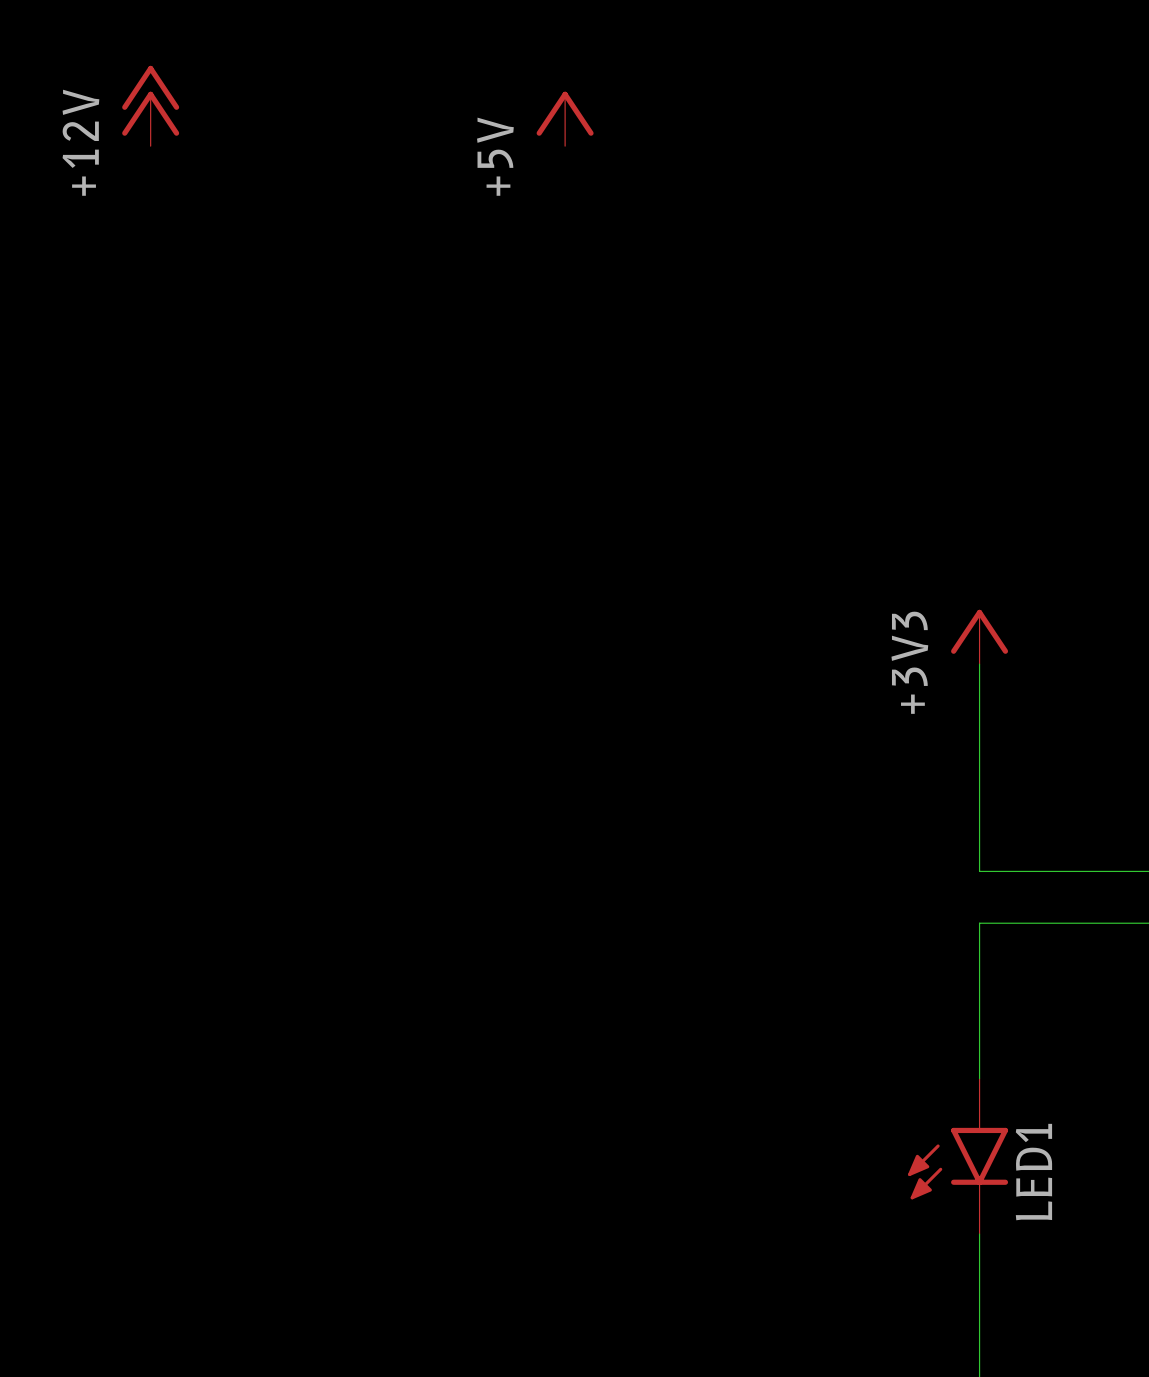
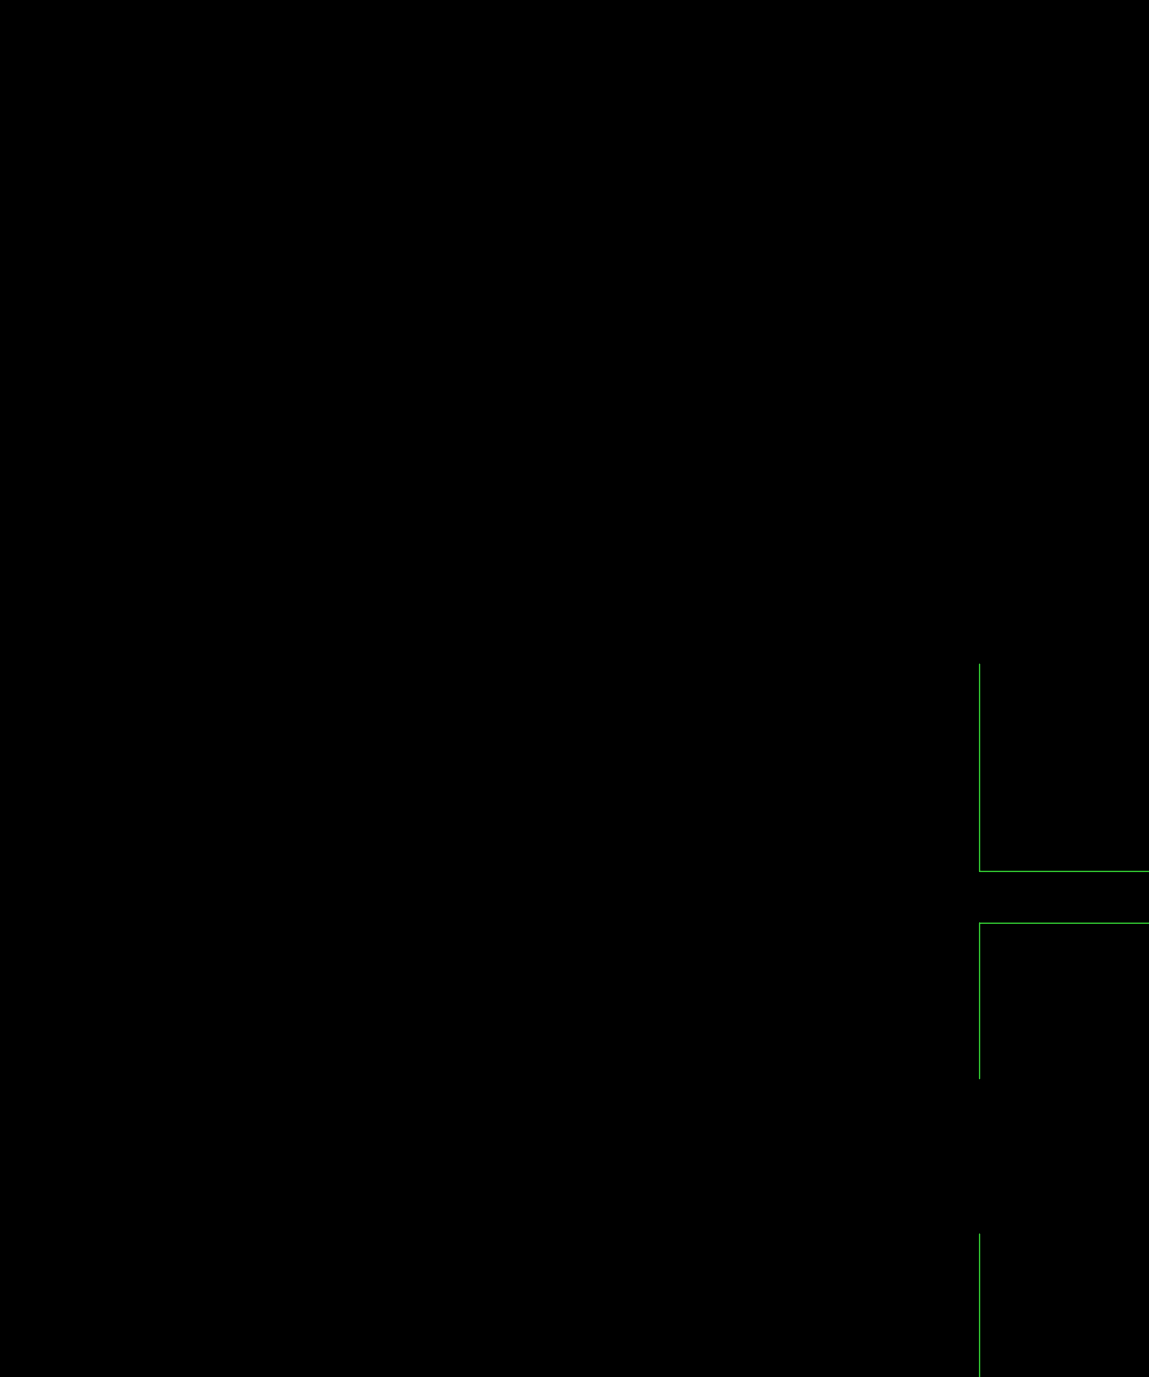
power symbol: +12V (150, 105) -> none
power symbol: +5V (565, 118) -> none
power symbol: +3V3 (979, 637) -> none
LED1: (958, 1156) -> none

